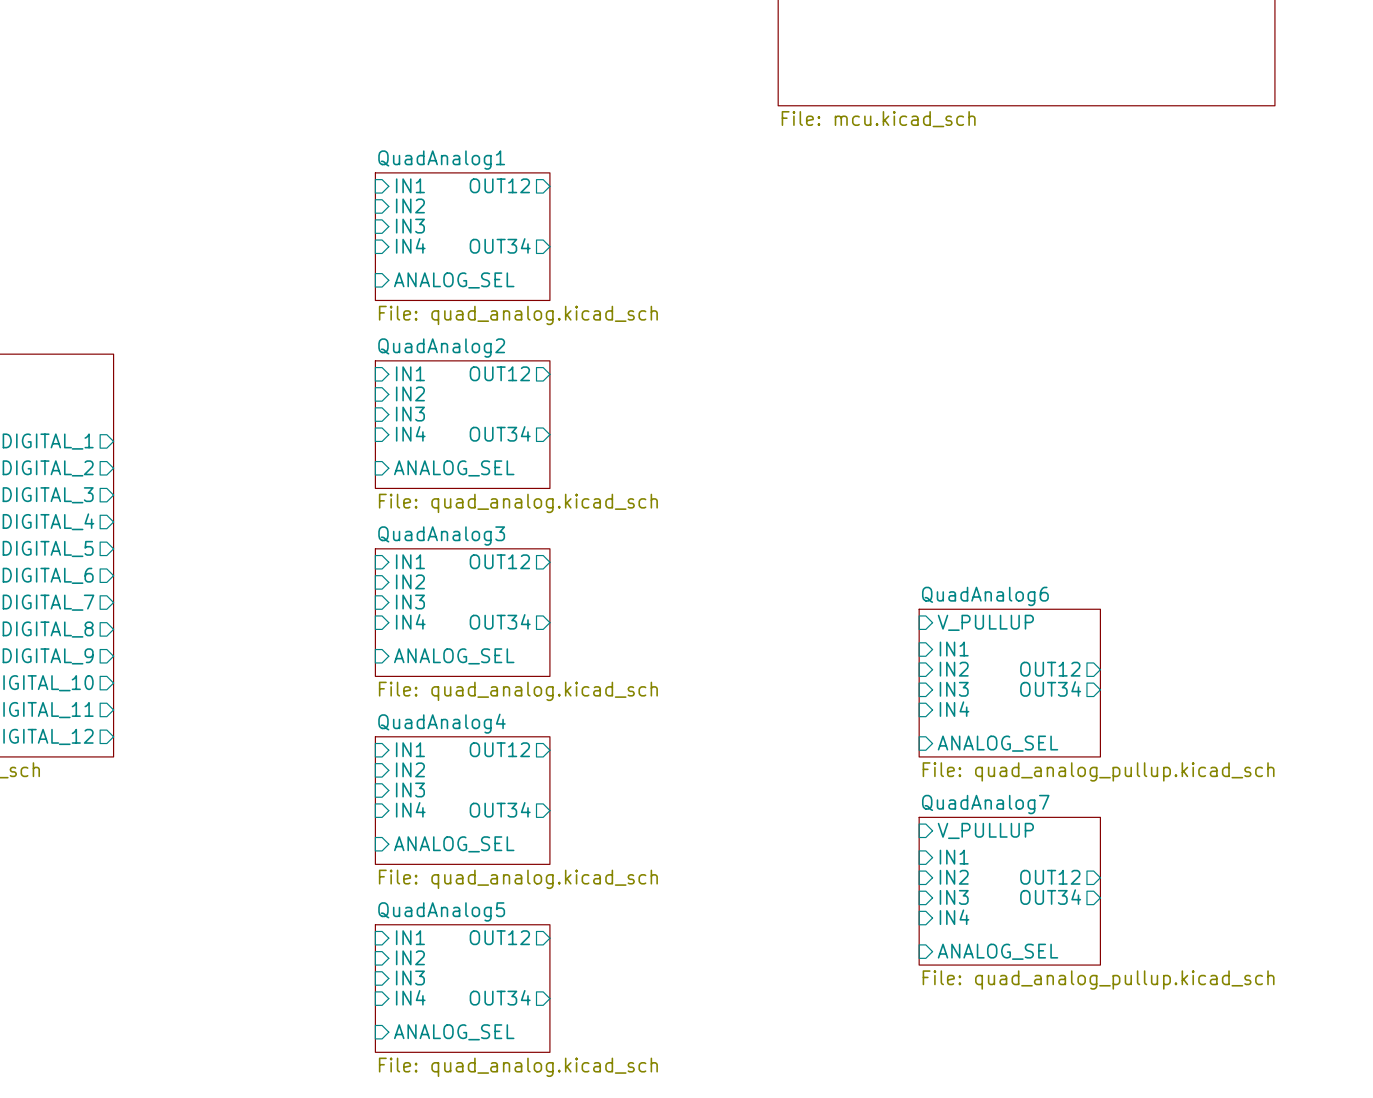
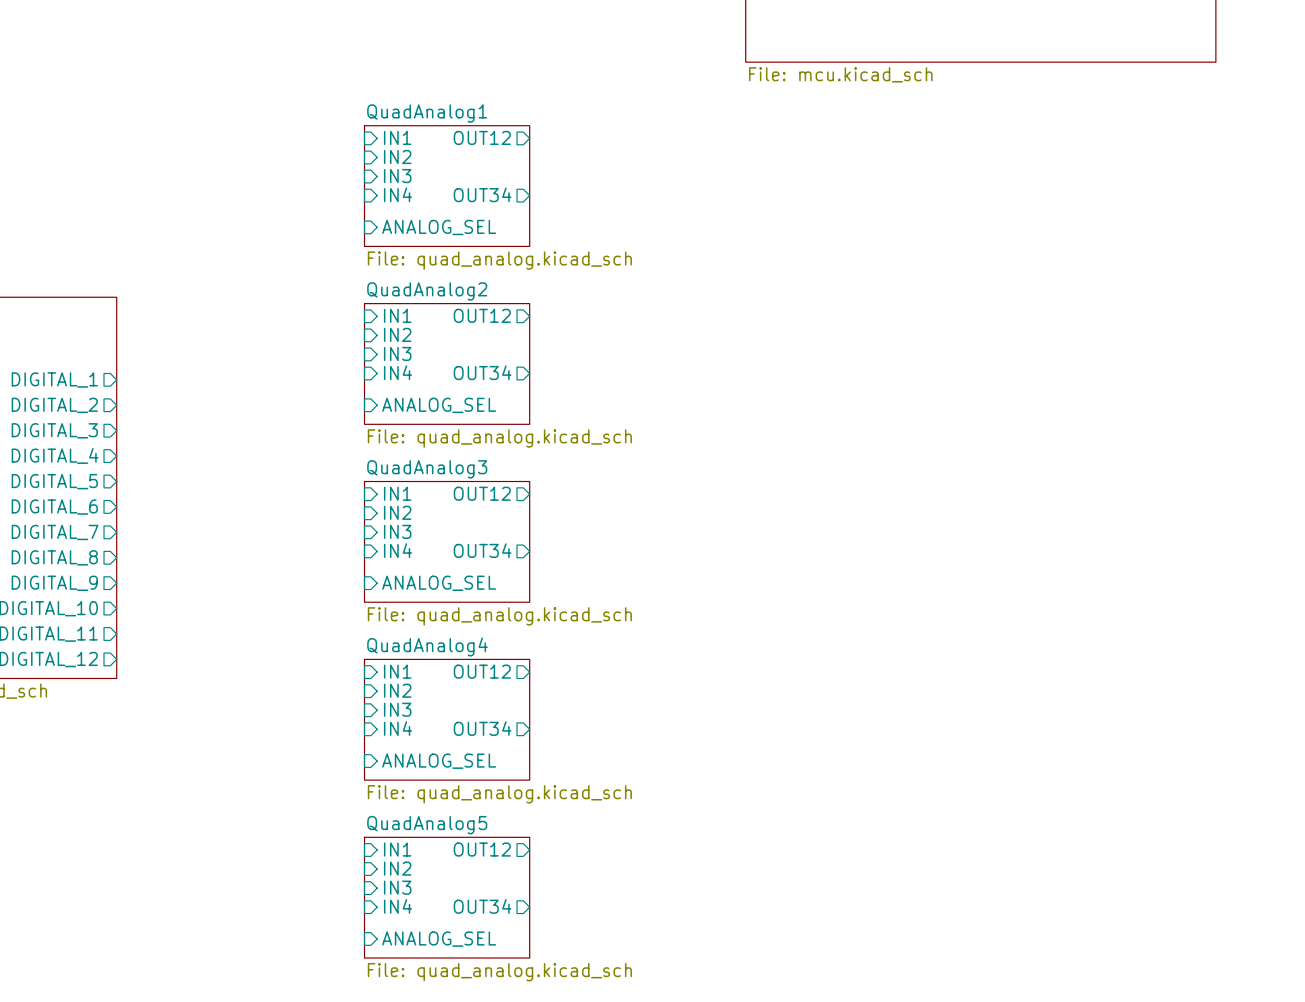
sheet pin: V_PULLUP (985, 622) -> none
sheet pin: IN1 (954, 649) -> none
sheet pin: IN2 (954, 669) -> none
sheet pin: OUT12 (1050, 669) -> none
sheet QuadAnalog6: File: quad_analog_pullup.kicad_sch (1009, 683) -> none
sheet pin: OUT34 (1050, 688) -> none
sheet pin: IN3 (954, 689) -> none
sheet pin: IN4 (954, 709) -> none
sheet pin: ANALOG_SEL (998, 743) -> none
sheet pin: V_PULLUP (985, 830) -> none
sheet pin: IN1 (954, 857) -> none
sheet pin: IN2 (954, 877) -> none
sheet pin: OUT12 (1050, 877) -> none
sheet QuadAnalog7: File: quad_analog_pullup.kicad_sch (1009, 891) -> none
sheet pin: IN3 (954, 897) -> none
sheet pin: OUT34 (1050, 897) -> none
sheet pin: IN4 (954, 917) -> none
sheet pin: ANALOG_SEL (998, 951) -> none

